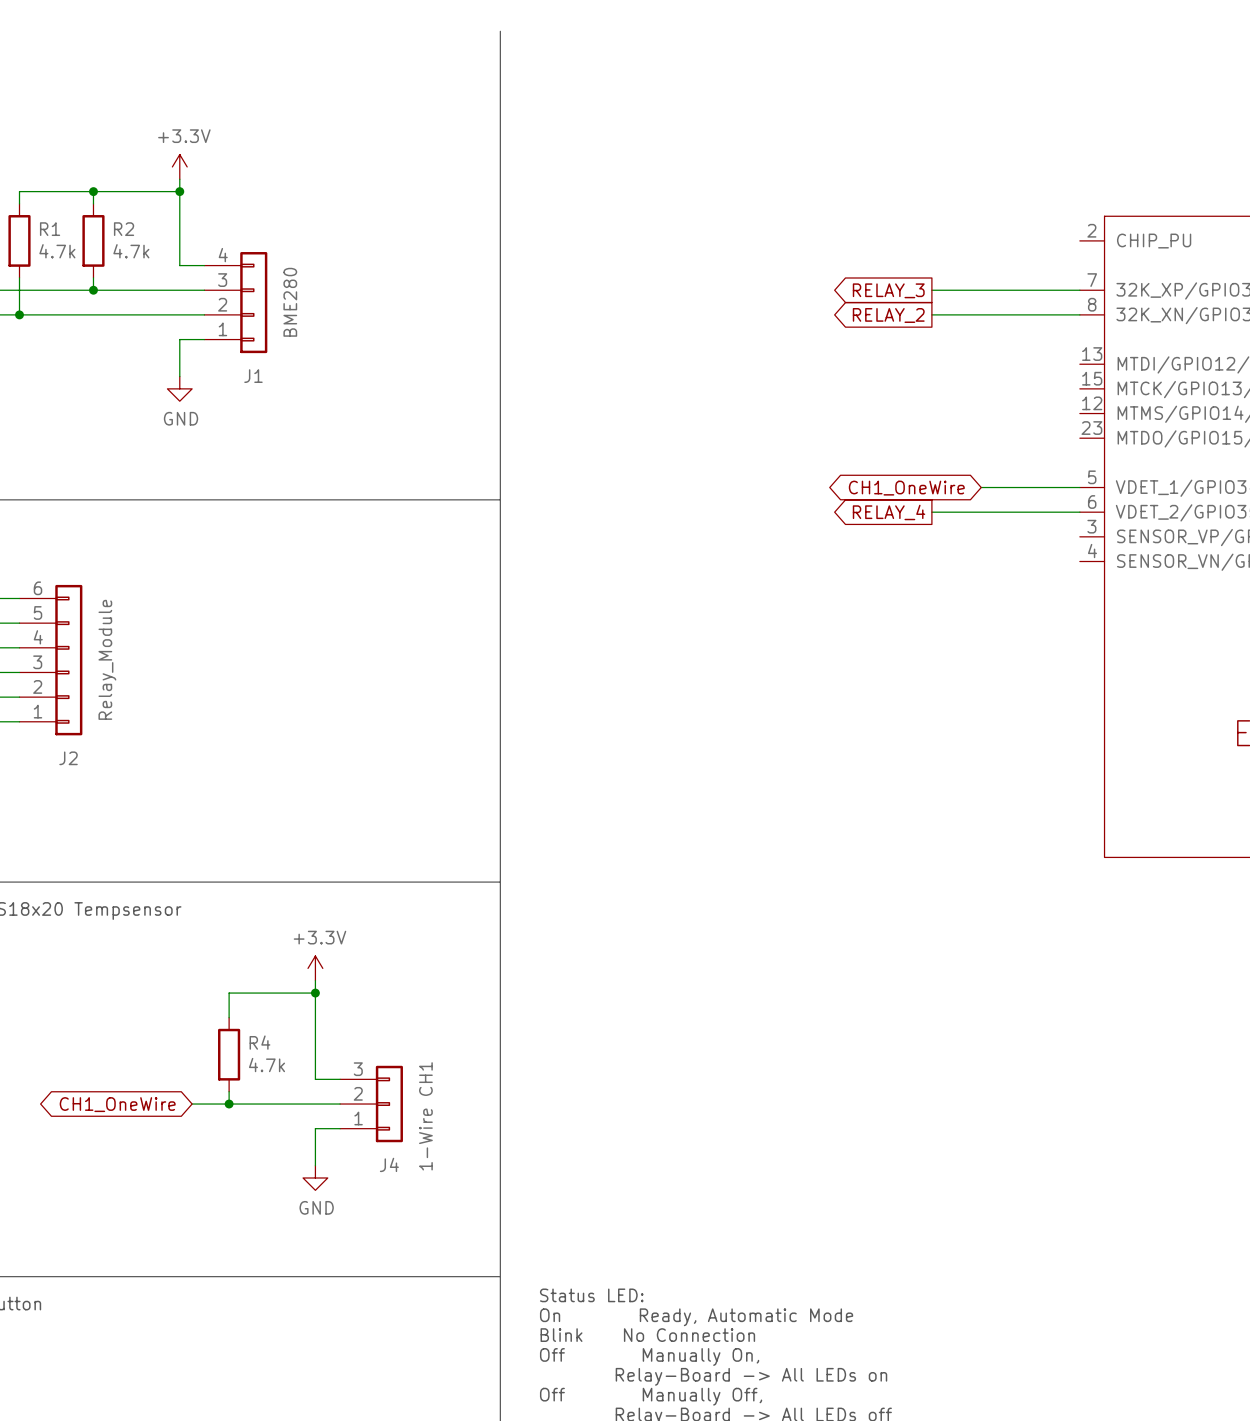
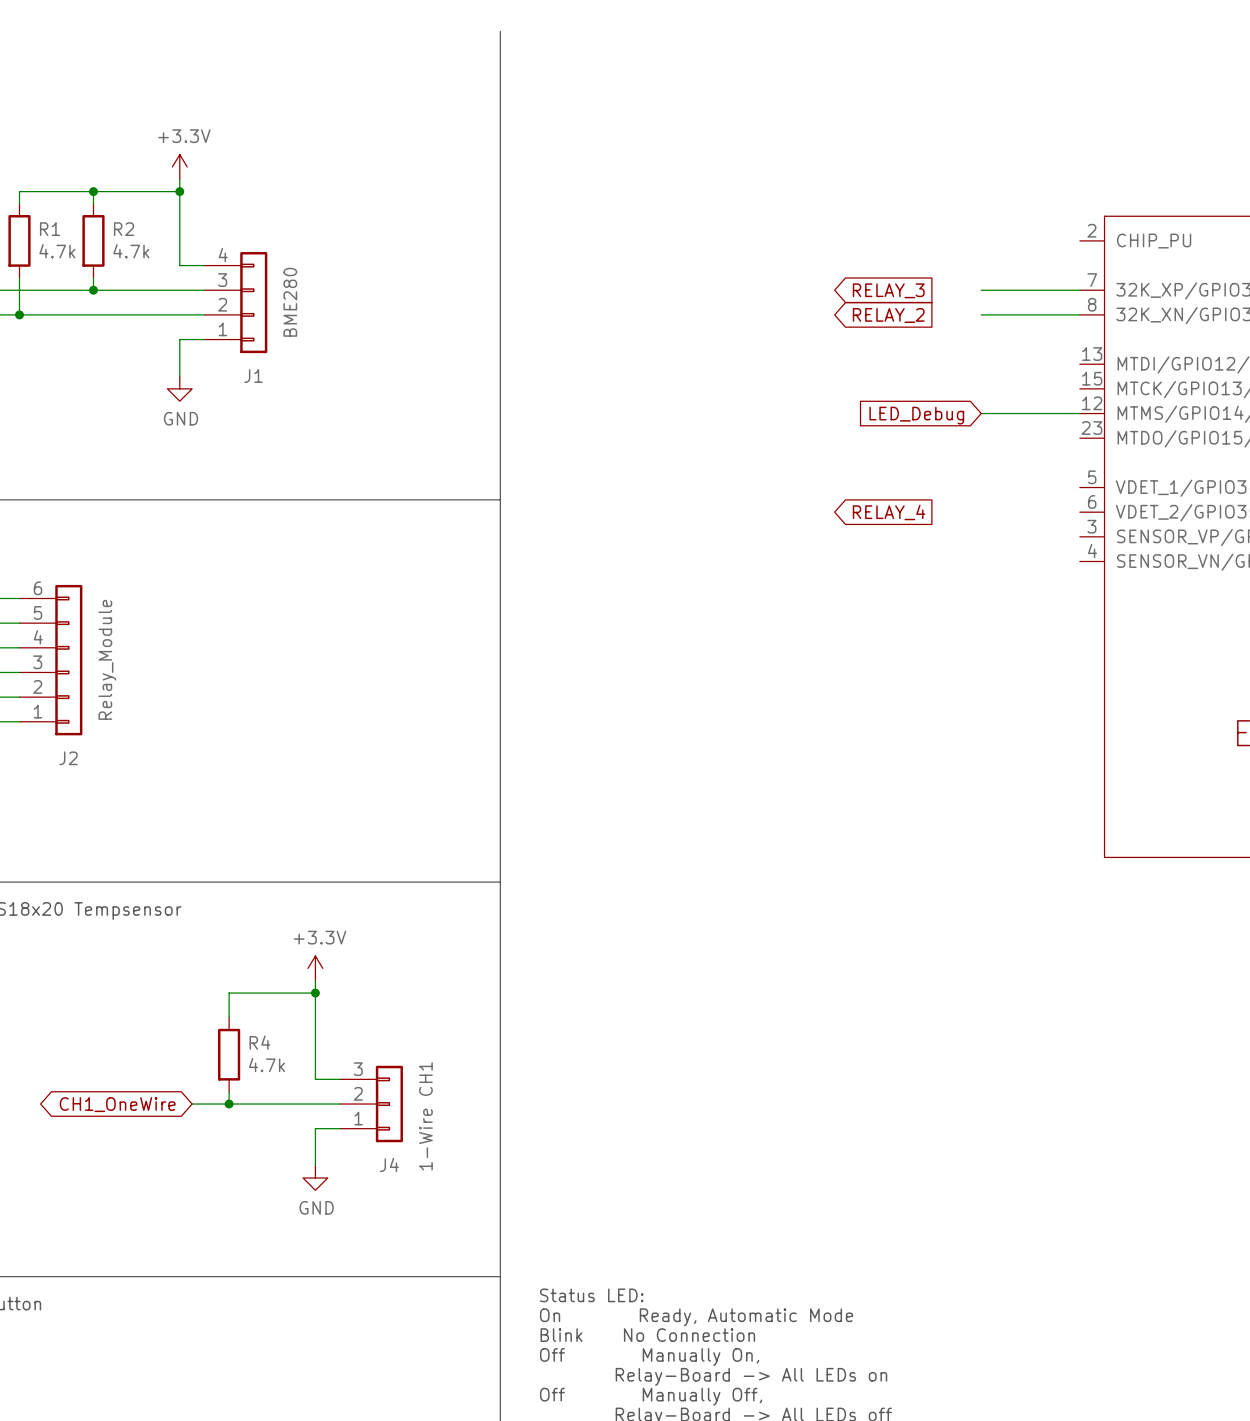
wire: (931, 290) (981, 290) -> none
wire: (931, 314) (981, 314) -> none
global label: none -> LED_Debug (916, 415)
wire: (981, 487) (1079, 487) -> (981, 413) (1079, 413)
global label: CH1_OneWire (906, 488) -> none
wire: (931, 512) (1079, 512) -> none

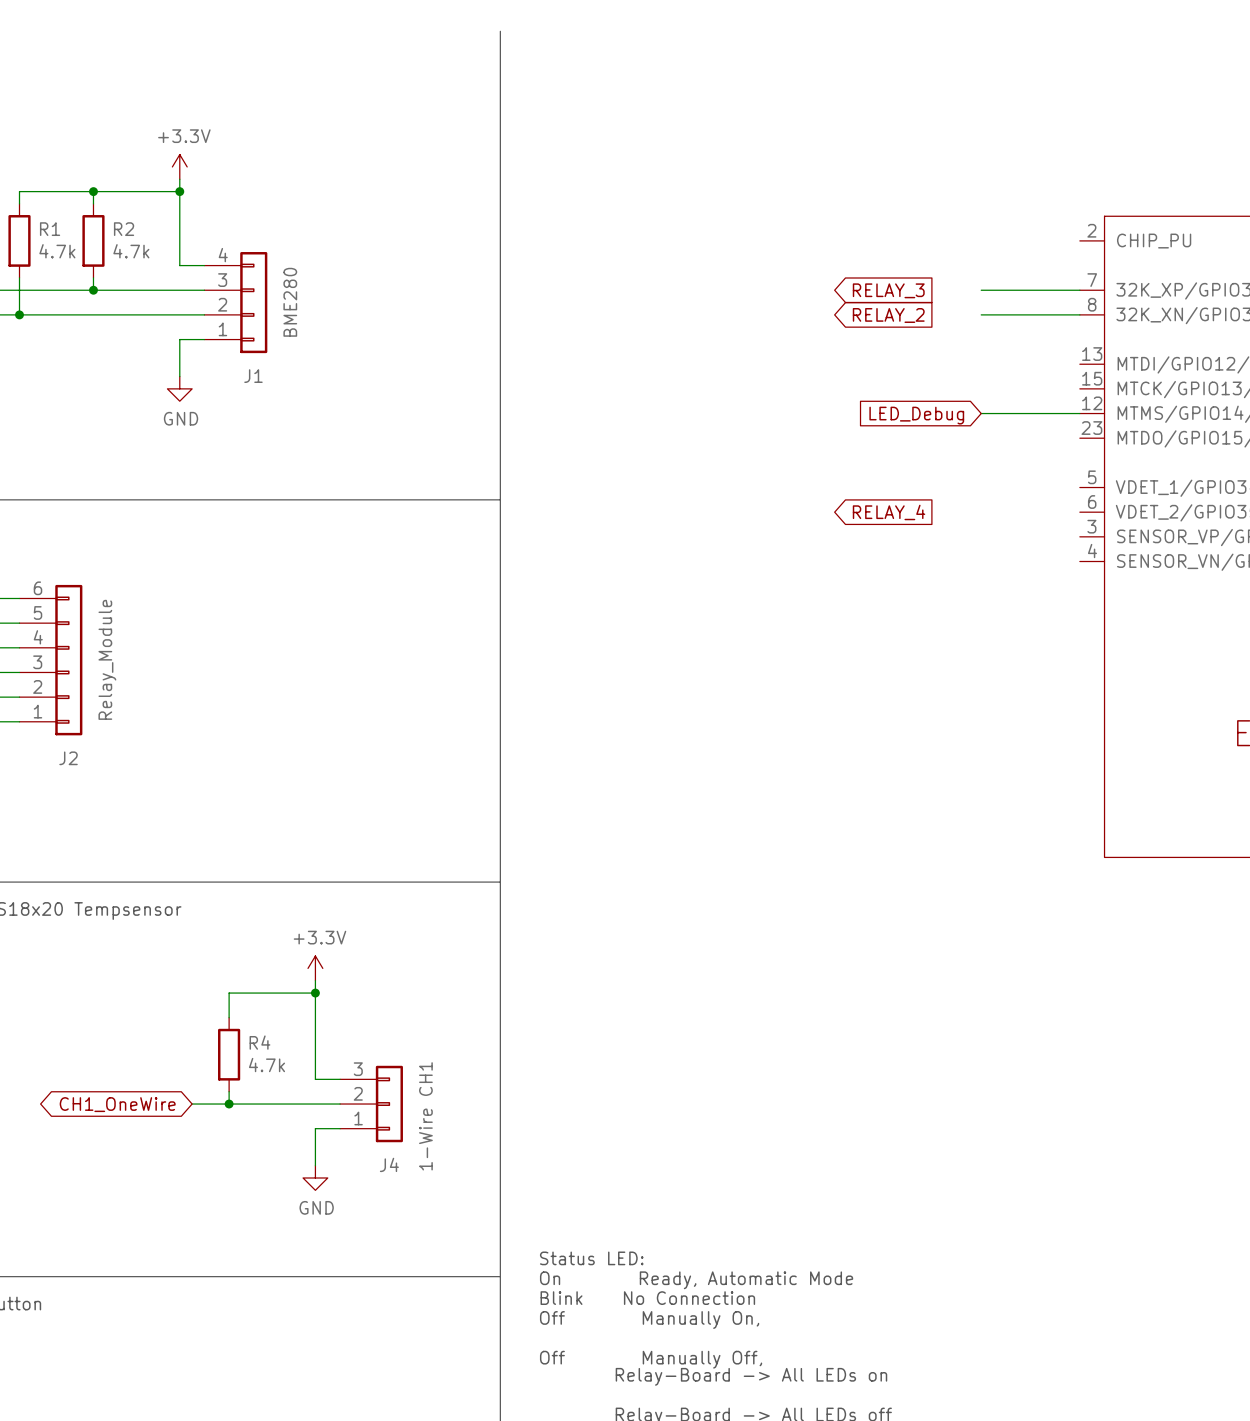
text position: Status LED: (591, 1295) -> Status LED: (591, 1258)
text position: On Ready, Automatic Mode (696, 1317) -> On Ready, Automatic Mode (696, 1280)
text position: Blink No Connection (647, 1335) -> Blink No Connection (647, 1298)
text position: Off Manually On, (649, 1356) -> Off Manually On, (649, 1320)
text position: Off Manually Off, (651, 1396) -> Off Manually Off, (651, 1359)

